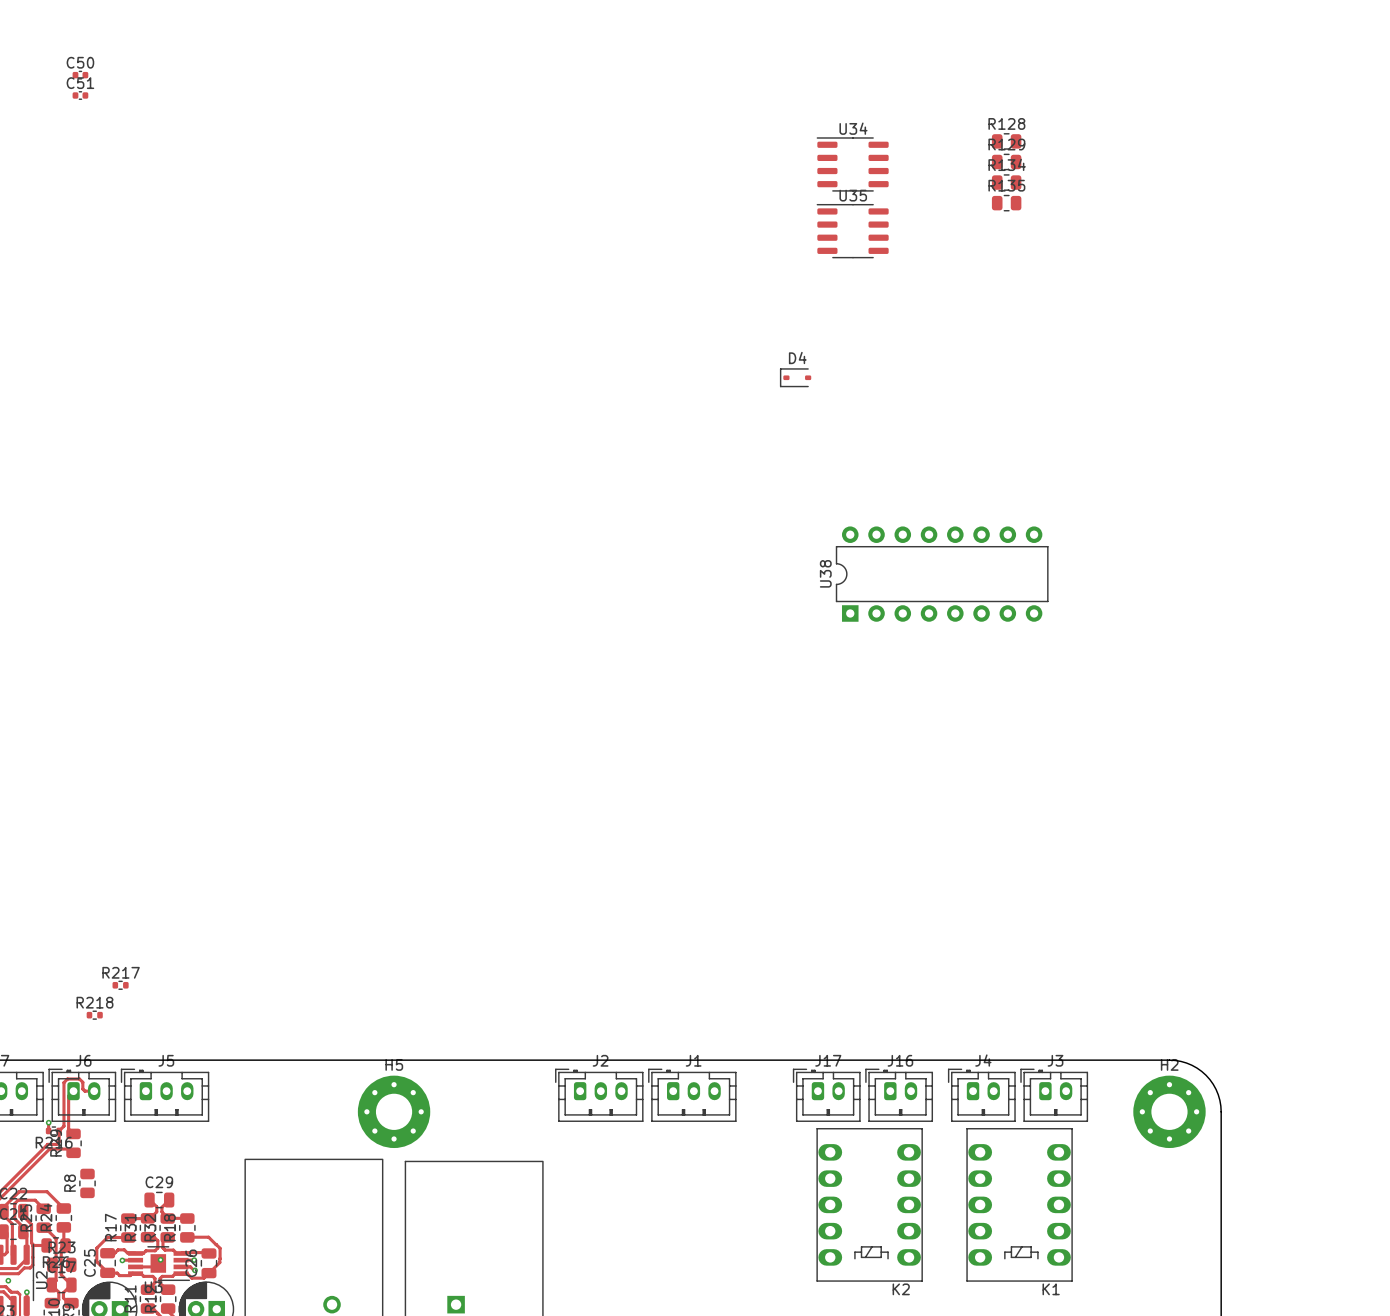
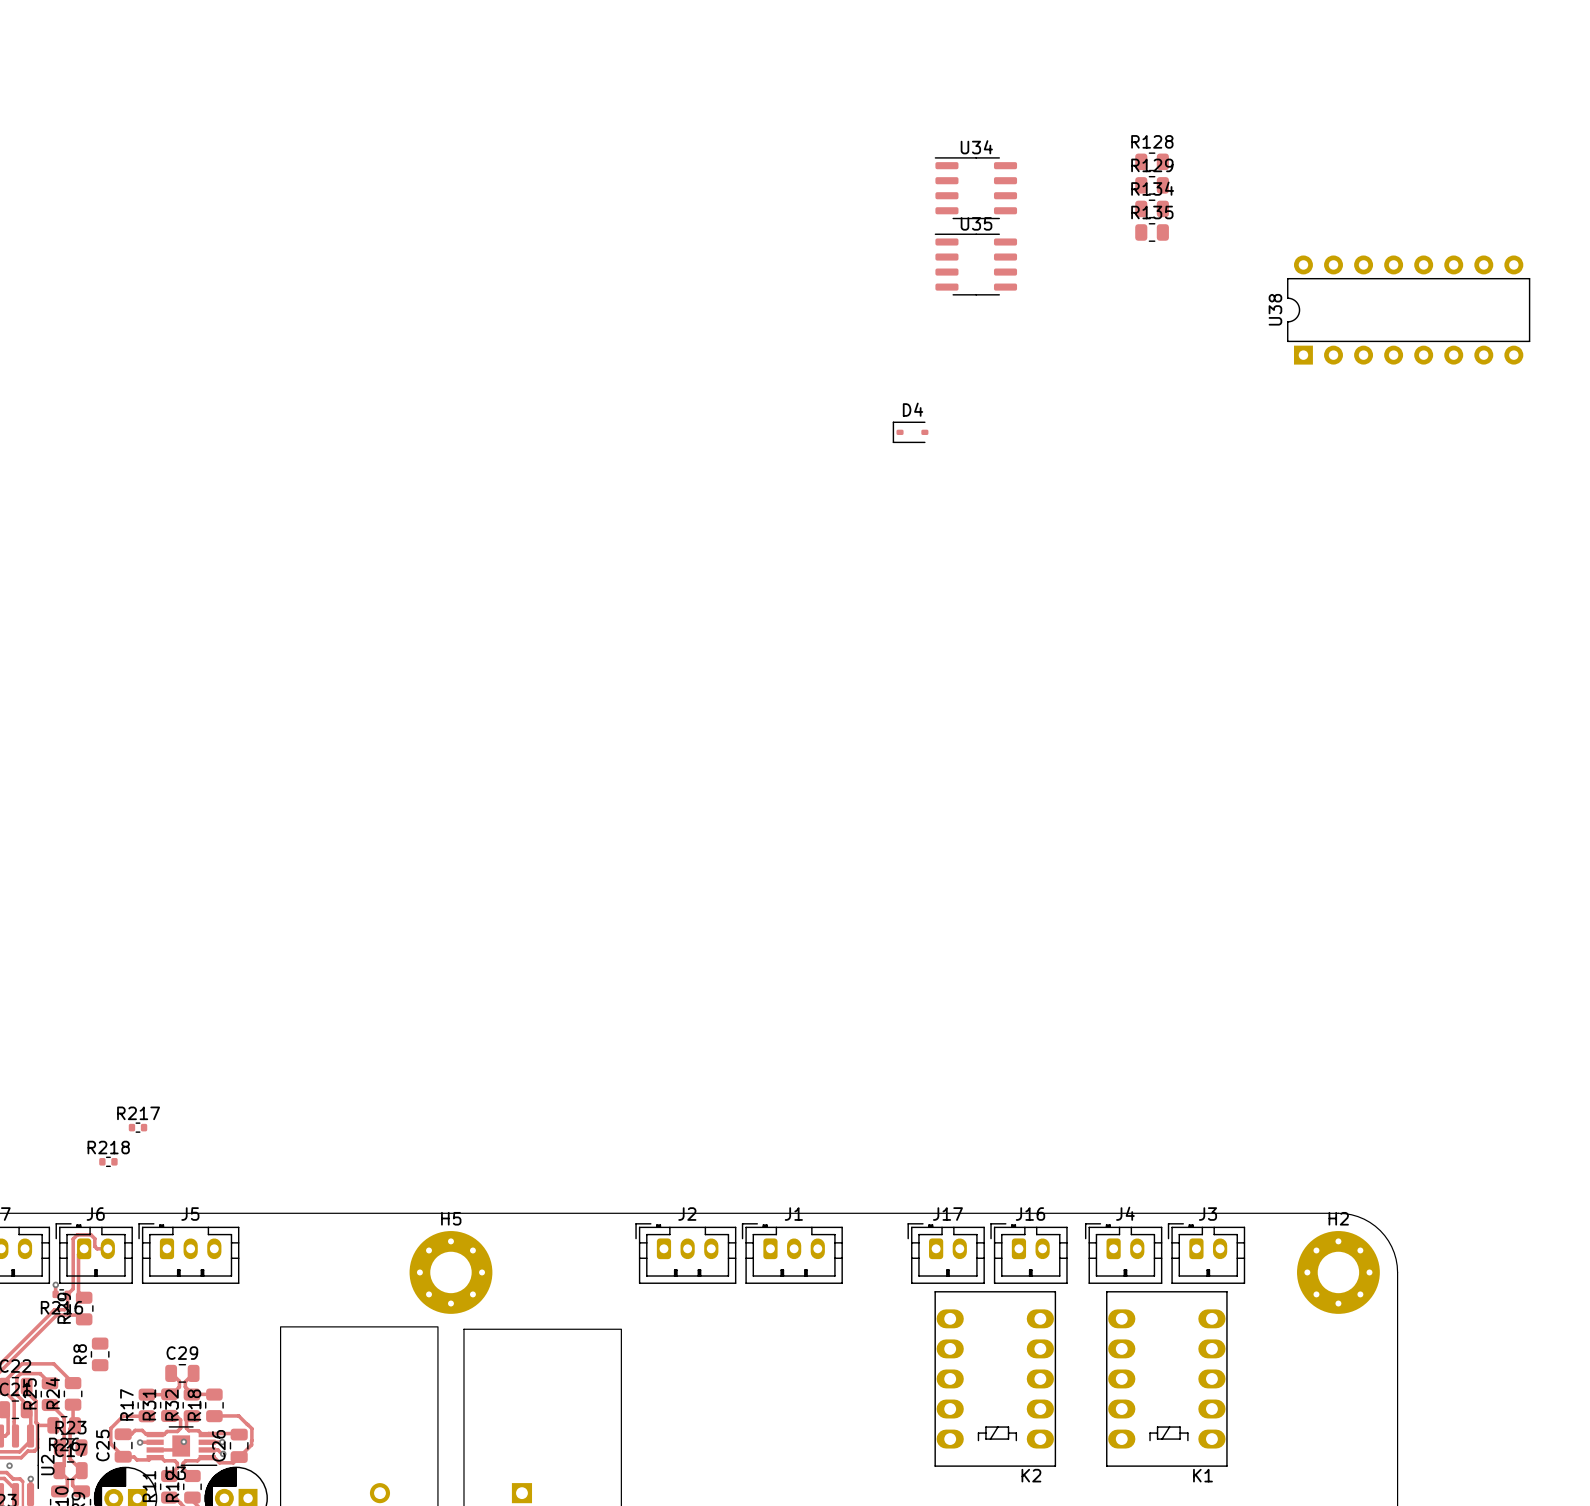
C50: (80, 75) -> none
C51: (80, 95) -> none
U38 position: (942, 574) -> (1408, 310)

